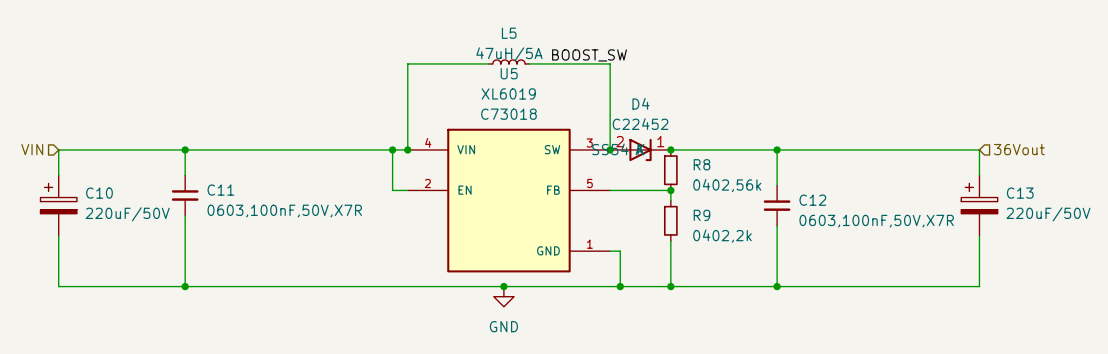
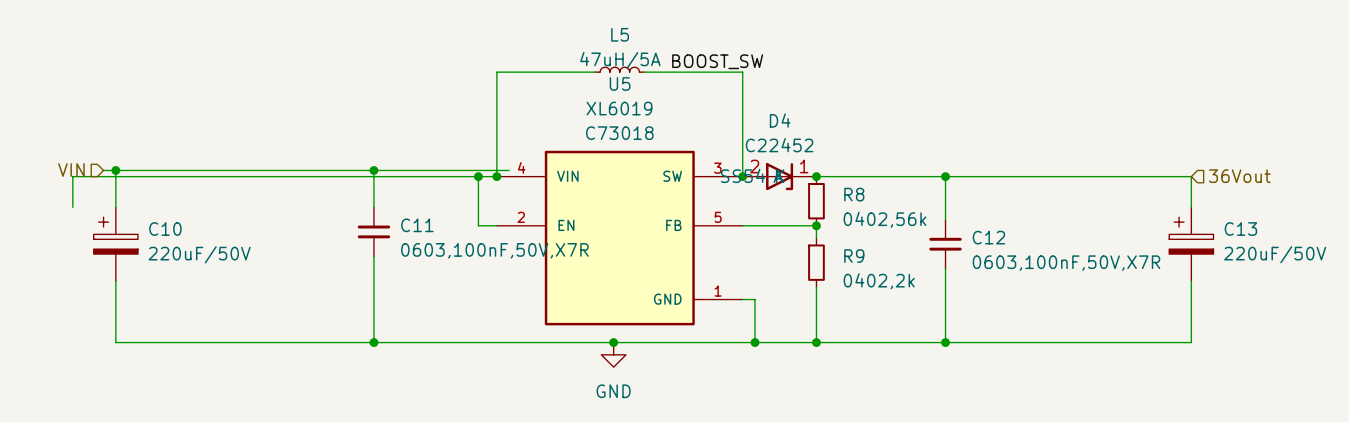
wire: none -> (103, 170) (509, 170)
wire: none -> (115, 170) (115, 207)
junction: none -> (115, 170)
wire: none -> (373, 170) (373, 207)
junction: none -> (373, 170)
hierarchical label position: VIN (32, 149) -> VIN (71, 170)
wire: (185, 149) (185, 175) -> none
junction: (185, 149) -> none
C11 position: (185, 195) -> (373, 231)
C10 position: (58, 205) -> (115, 244)
wire: (185, 215) (185, 286) -> (373, 256) (373, 342)
wire: (58, 235) (58, 286) (94, 286) -> (115, 281) (115, 342)
junction: (185, 286) -> none
junction: none -> (373, 342)

